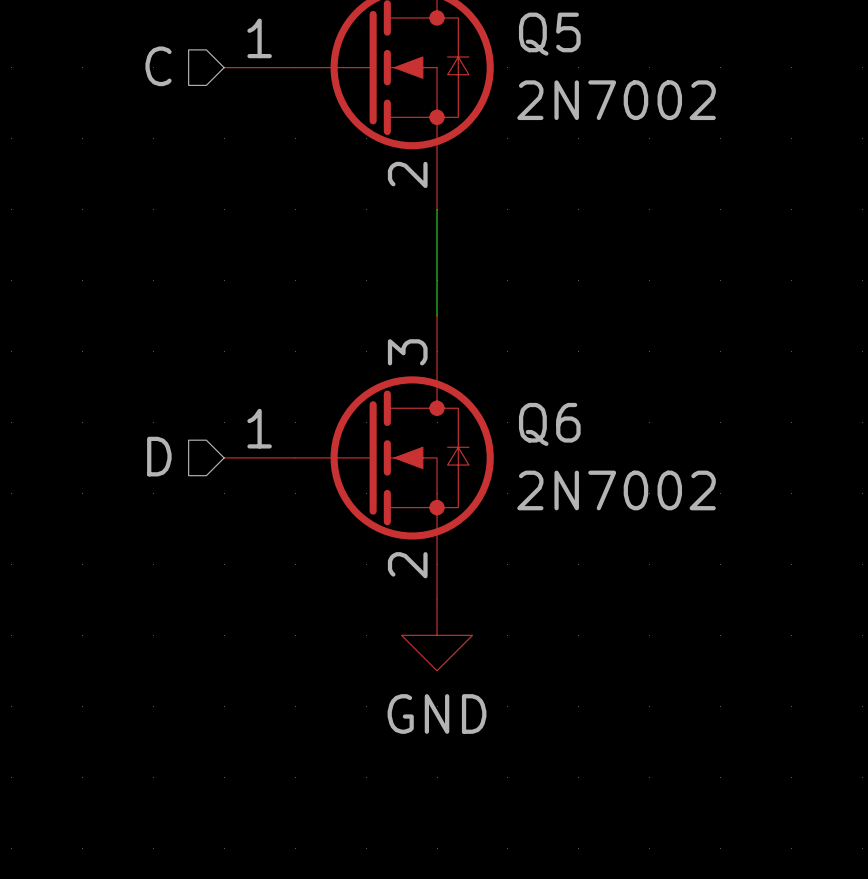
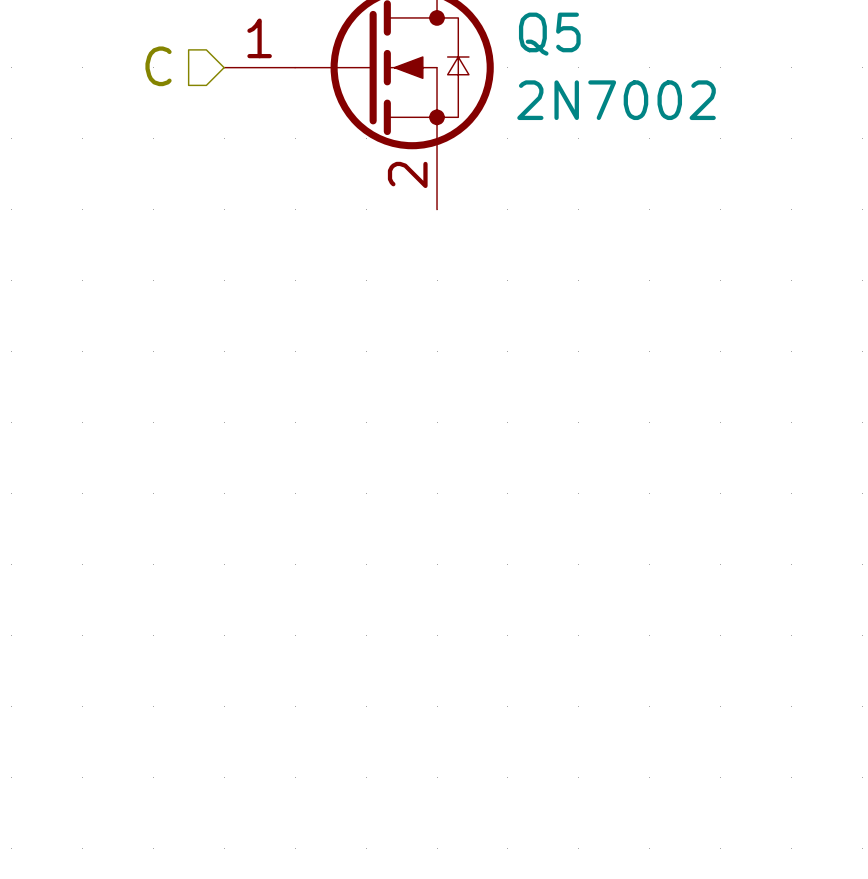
wire: (437, 209) (437, 316) -> none
hierarchical label: D (159, 456) -> none
Q6: 2N7002 (358, 457) -> none
power symbol: GND (437, 635) -> none

